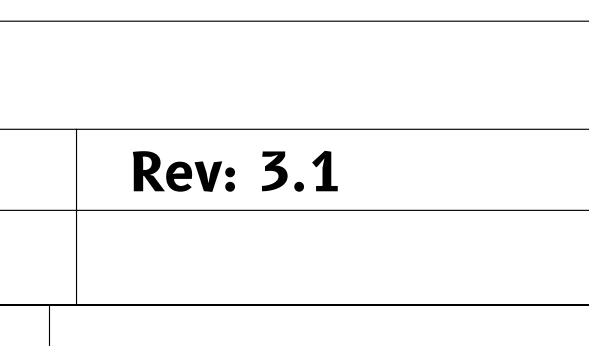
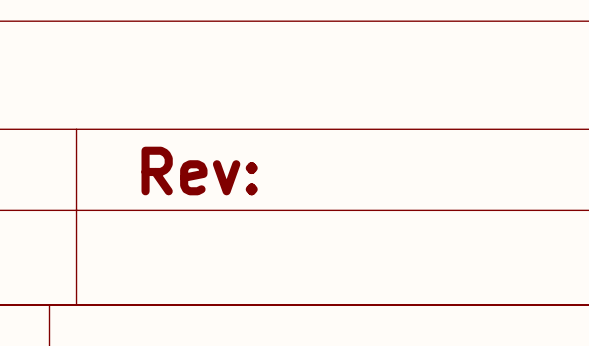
title block: Rev: 3.1 (235, 171) -> Rev: (199, 171)

